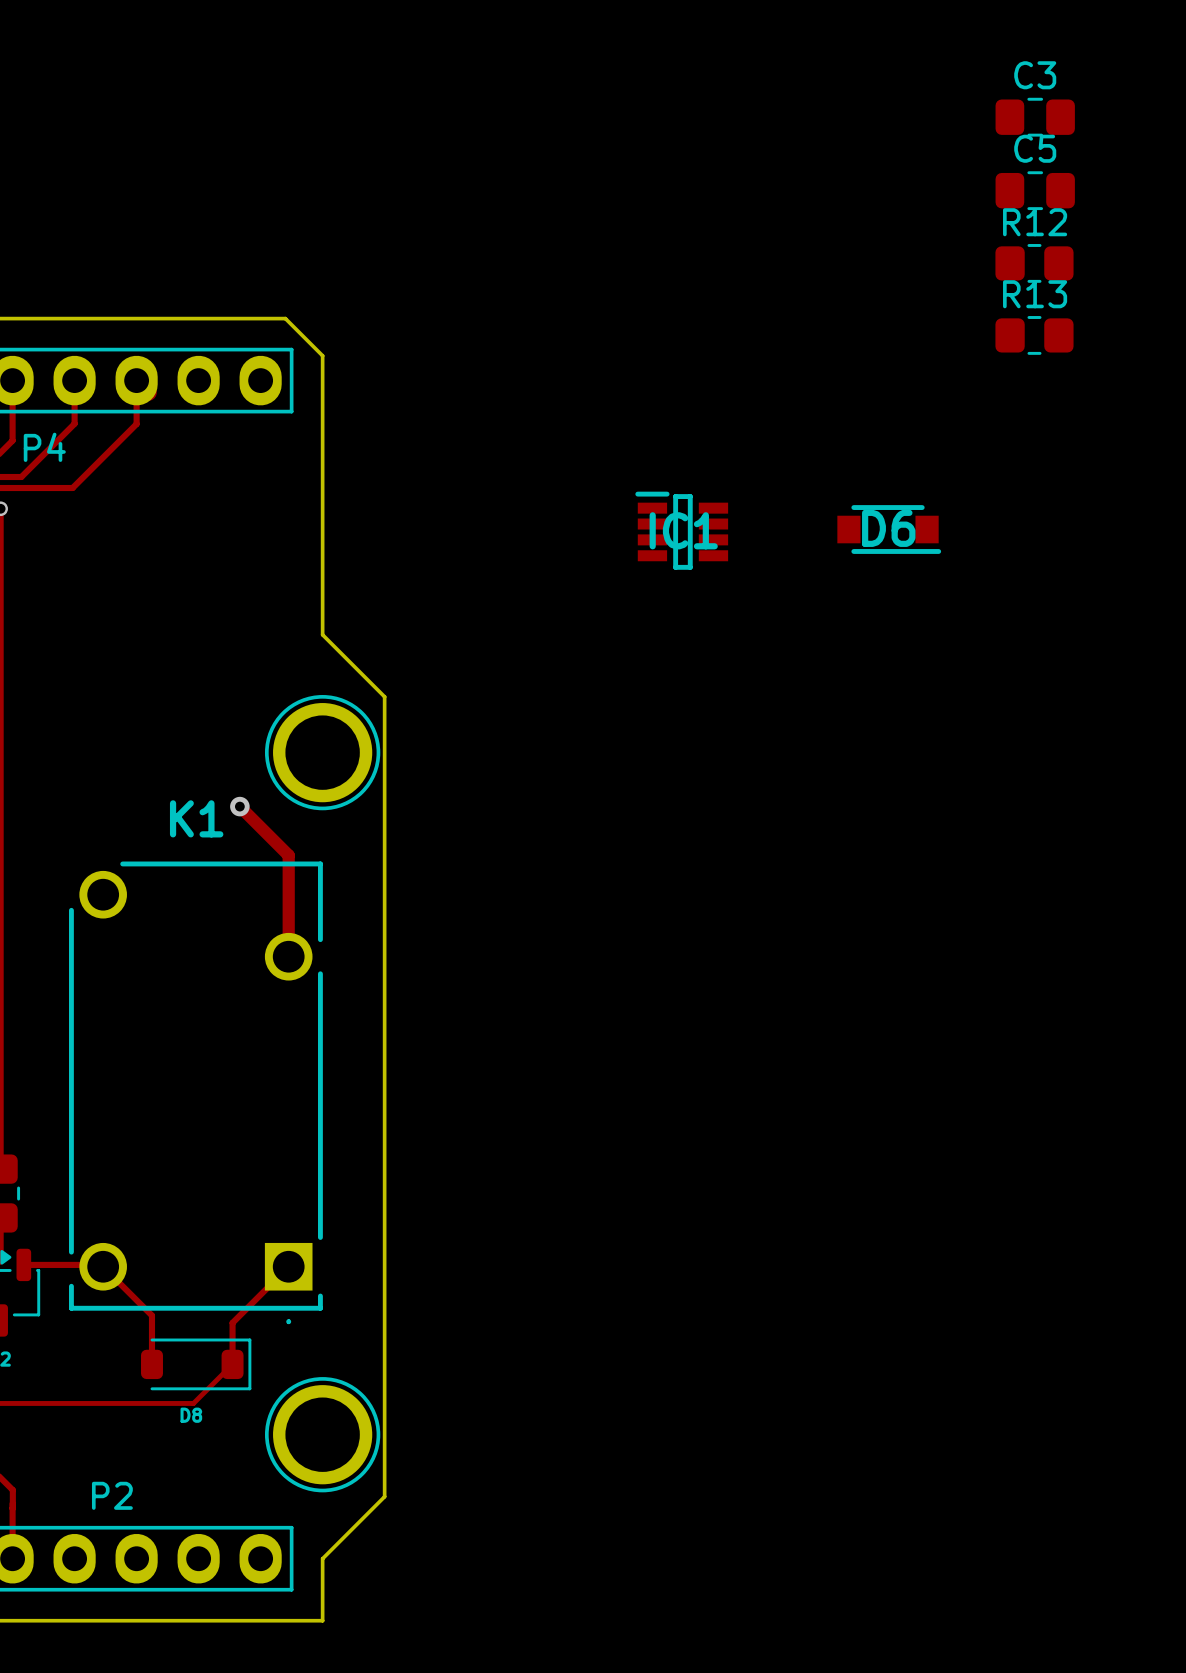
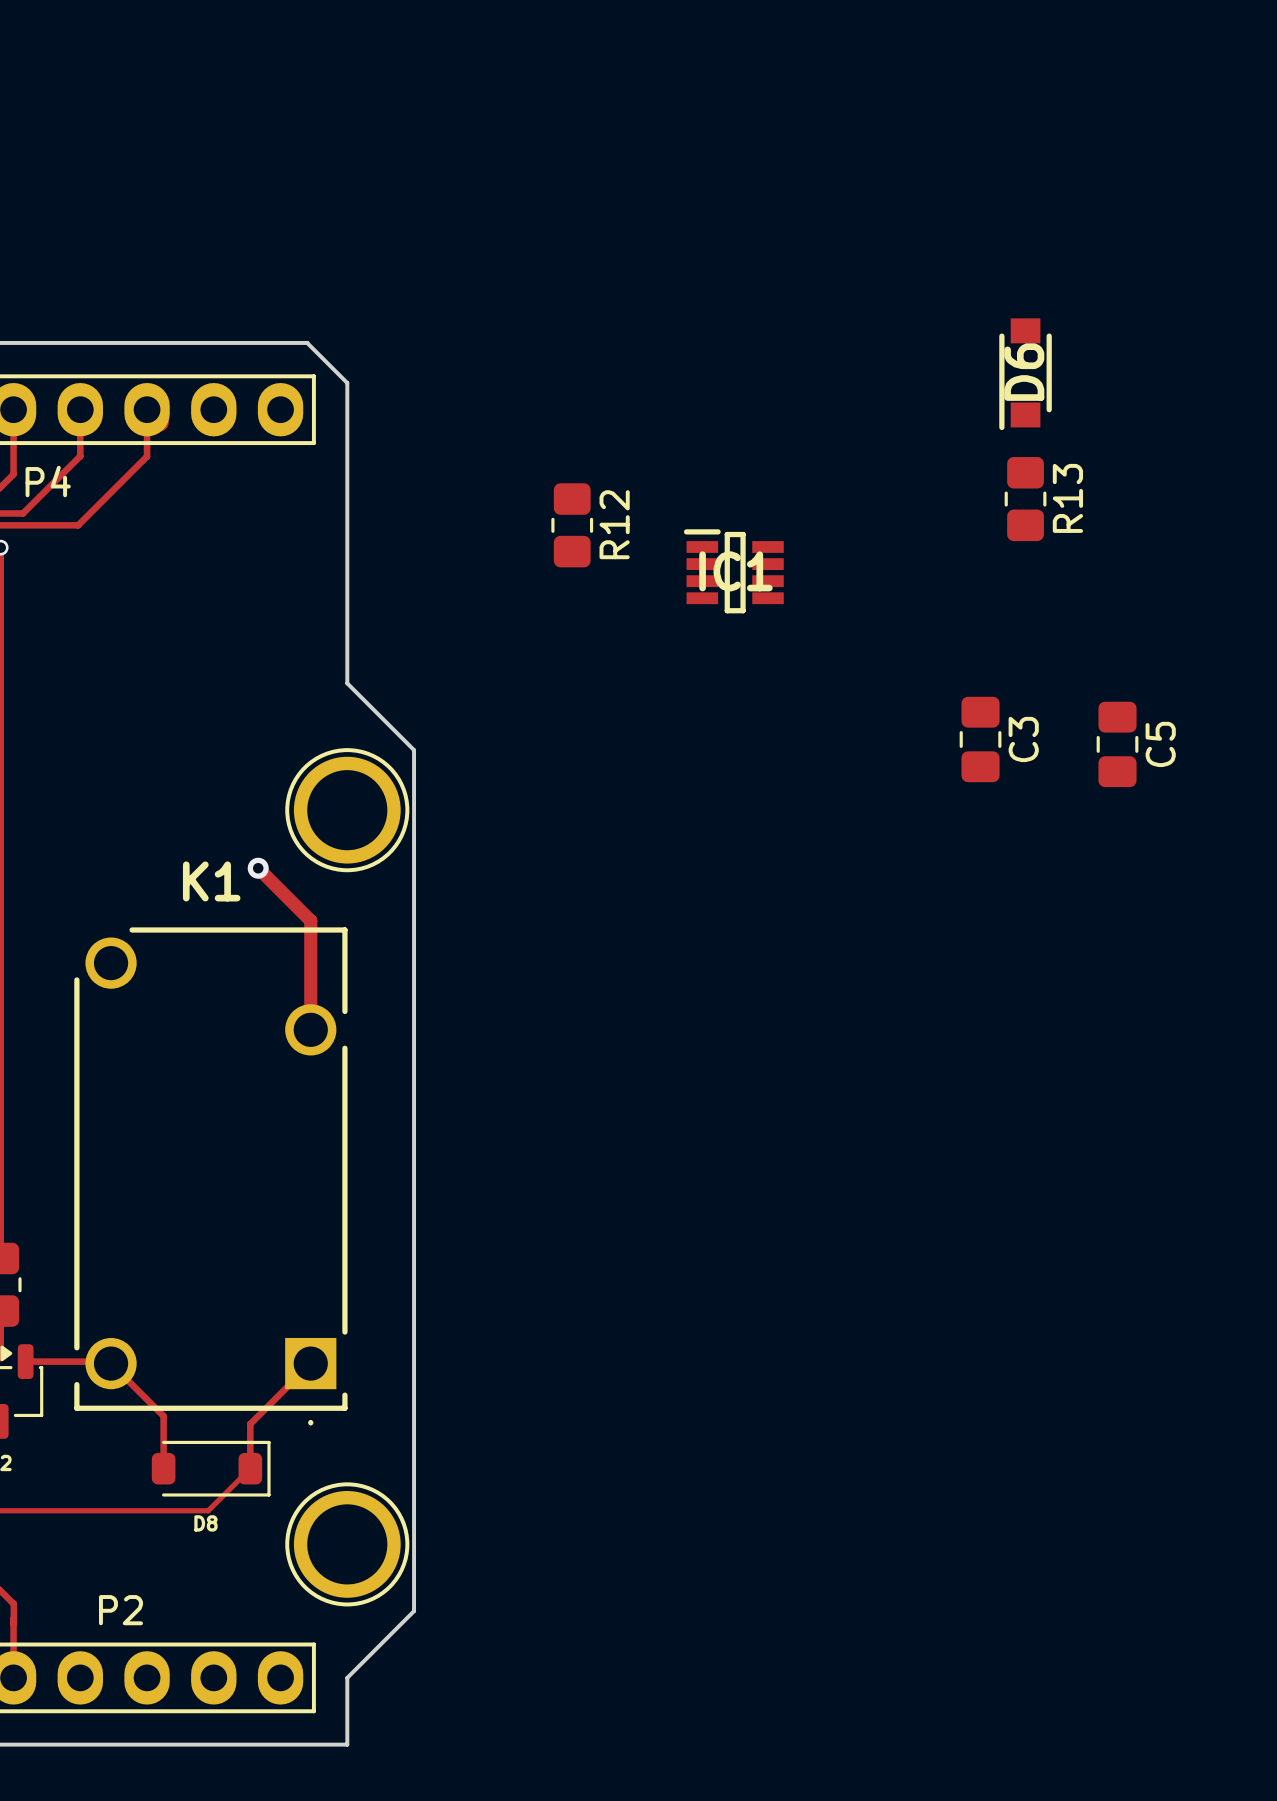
C3 rotation: 0° (1035, 117) -> 90° clockwise (980, 739)
C3 position: (1035, 117) -> (980, 739)
C5 rotation: 0° (1035, 190) -> 90° clockwise (1117, 744)
C5 position: (1035, 190) -> (1117, 744)
R12 rotation: 0° (1034, 263) -> 90° clockwise (572, 525)
R12 position: (1034, 263) -> (572, 525)
R13 rotation: 0° (1034, 335) -> 90° clockwise (1025, 499)
R13 position: (1034, 335) -> (1025, 499)
D6 rotation: 0° (889, 529) -> 90° clockwise (1025, 374)
D6 position: (889, 529) -> (1025, 374)

